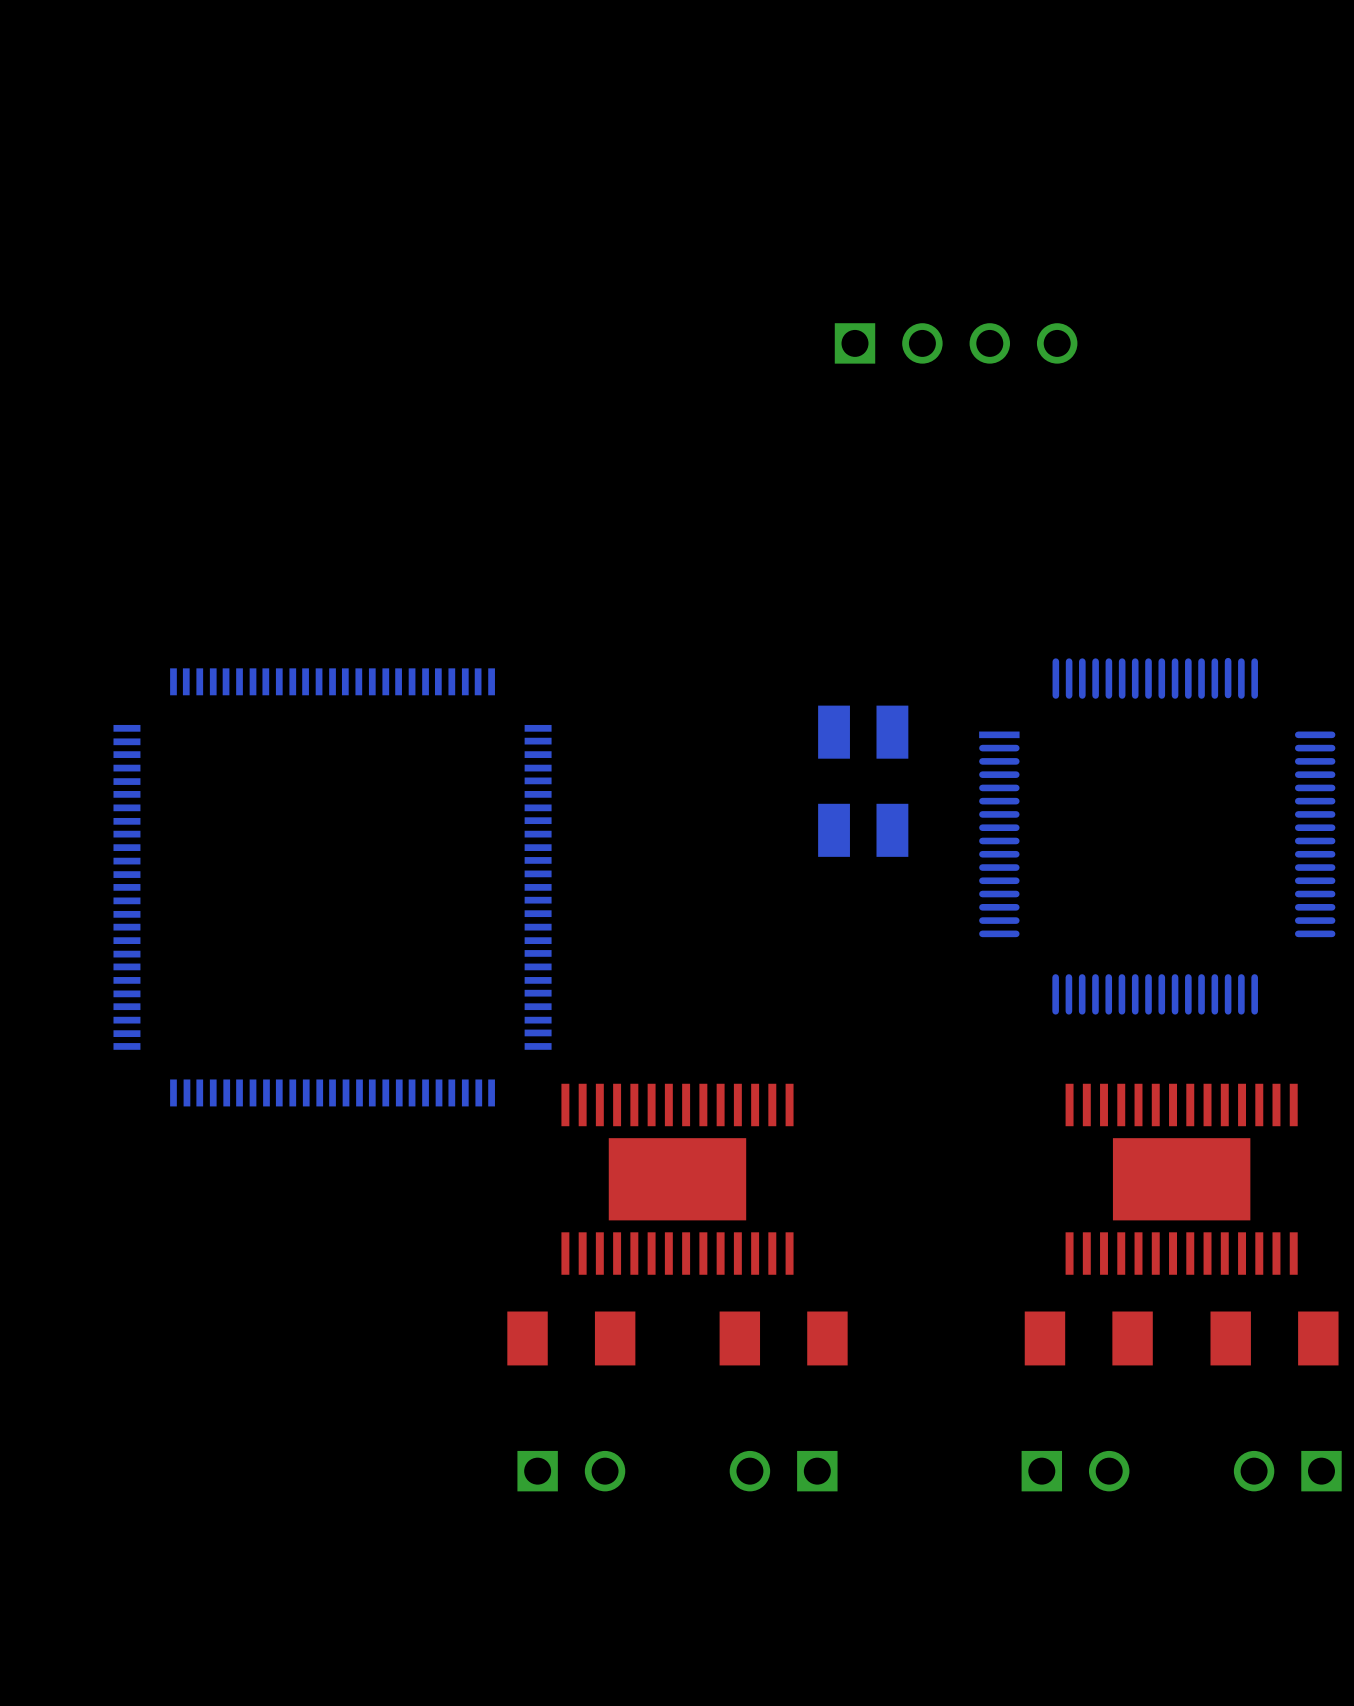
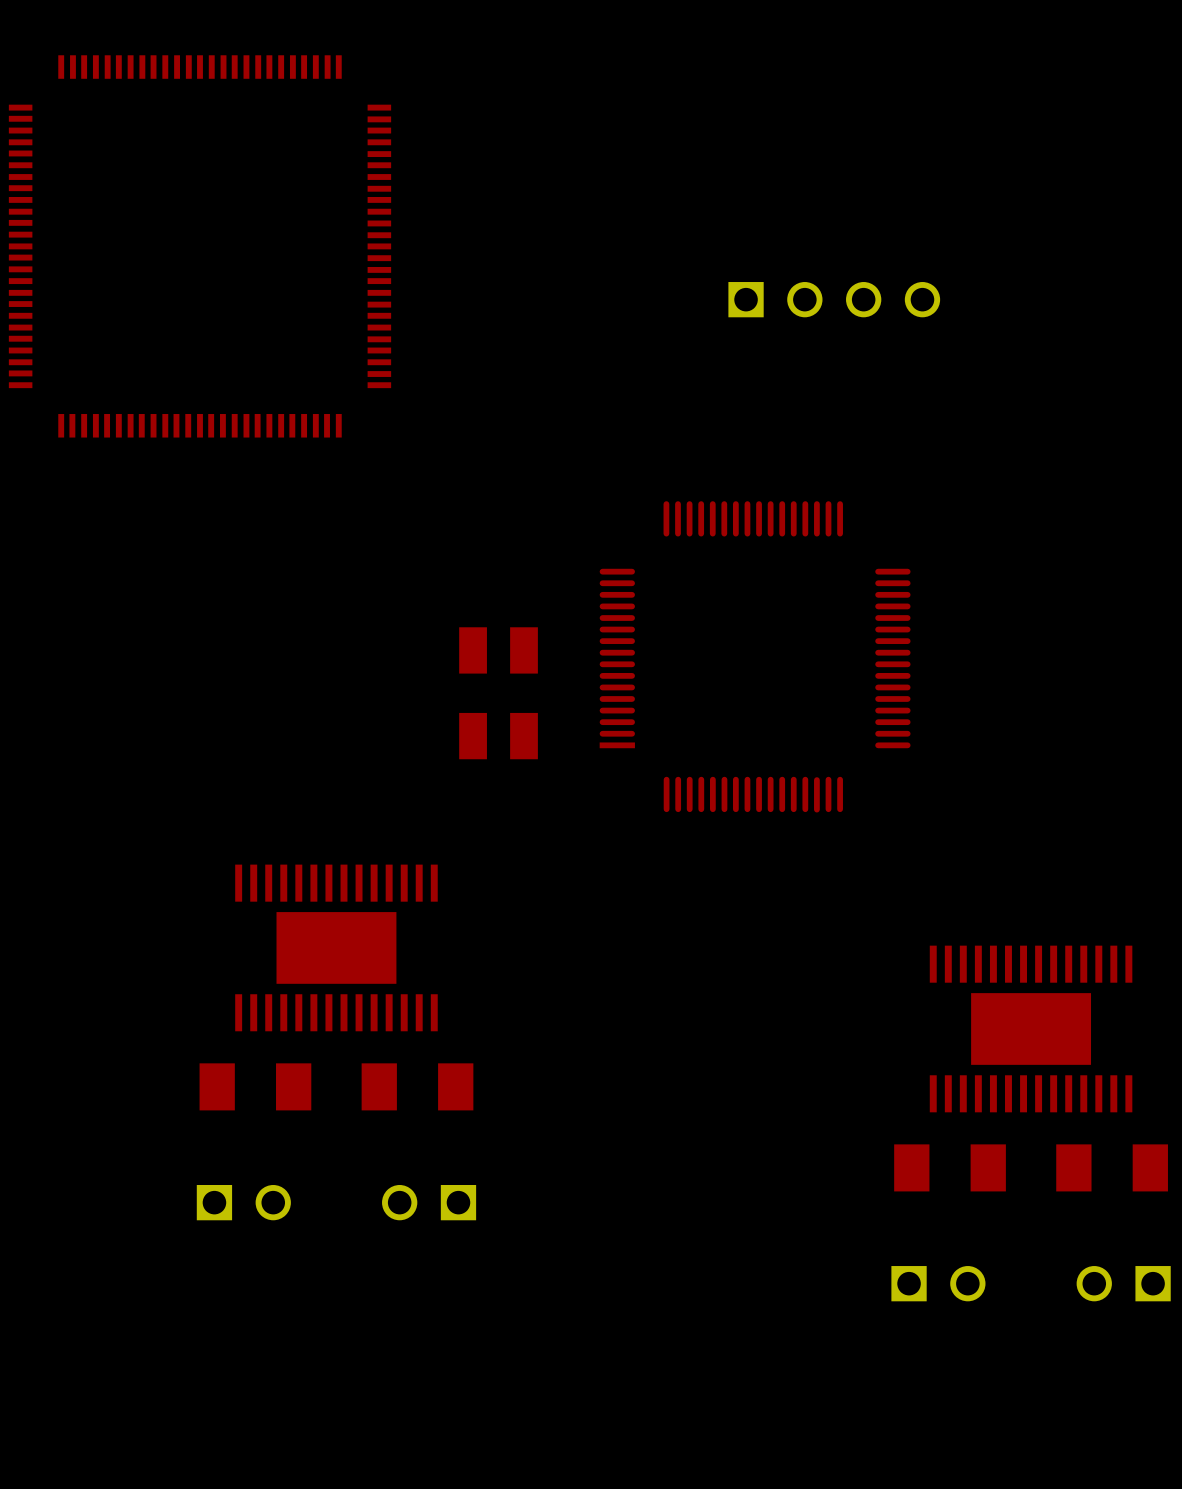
part side: bottom (863, 781) -> top (498, 693)
part side: bottom (1157, 836) -> top (755, 656)
part side: bottom (332, 887) -> top (199, 246)
part position: (677, 1179) -> (336, 947)
part: none -> (255, 1086)
part position: (571, 1338) -> (417, 1086)
part: (783, 1338) -> none
part: none -> (243, 1202)
part rotation: 0° (571, 1471) -> 180° (429, 1202)
part position: (571, 1471) -> (429, 1202)
part: (783, 1471) -> none

